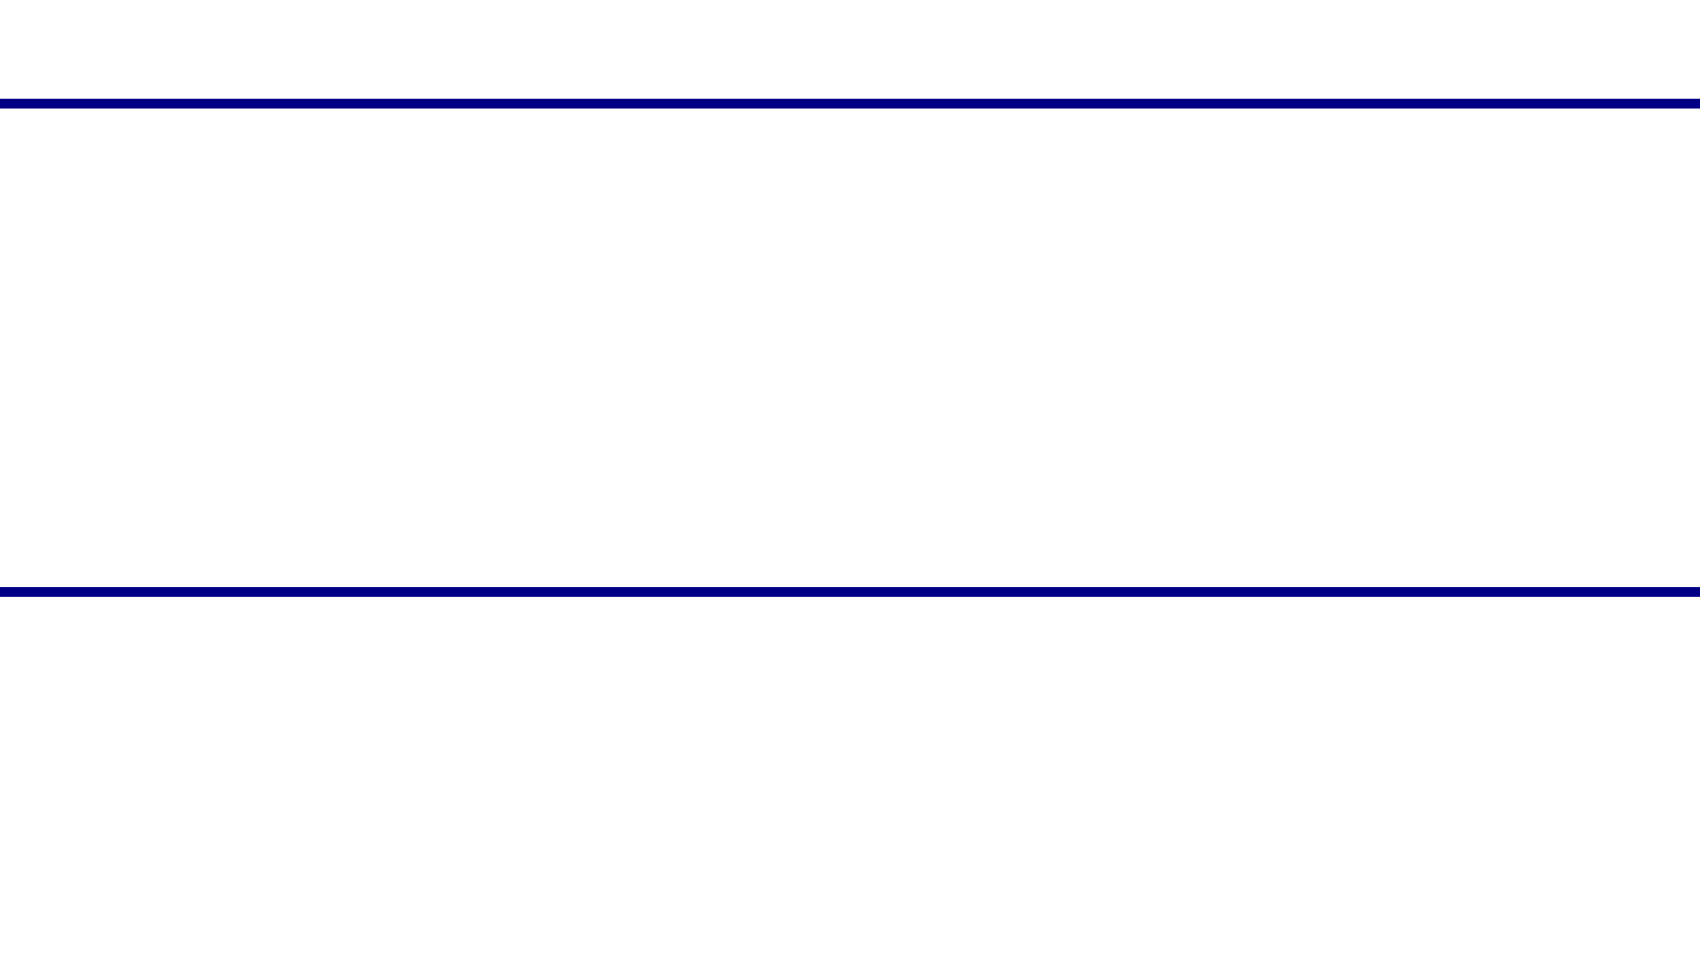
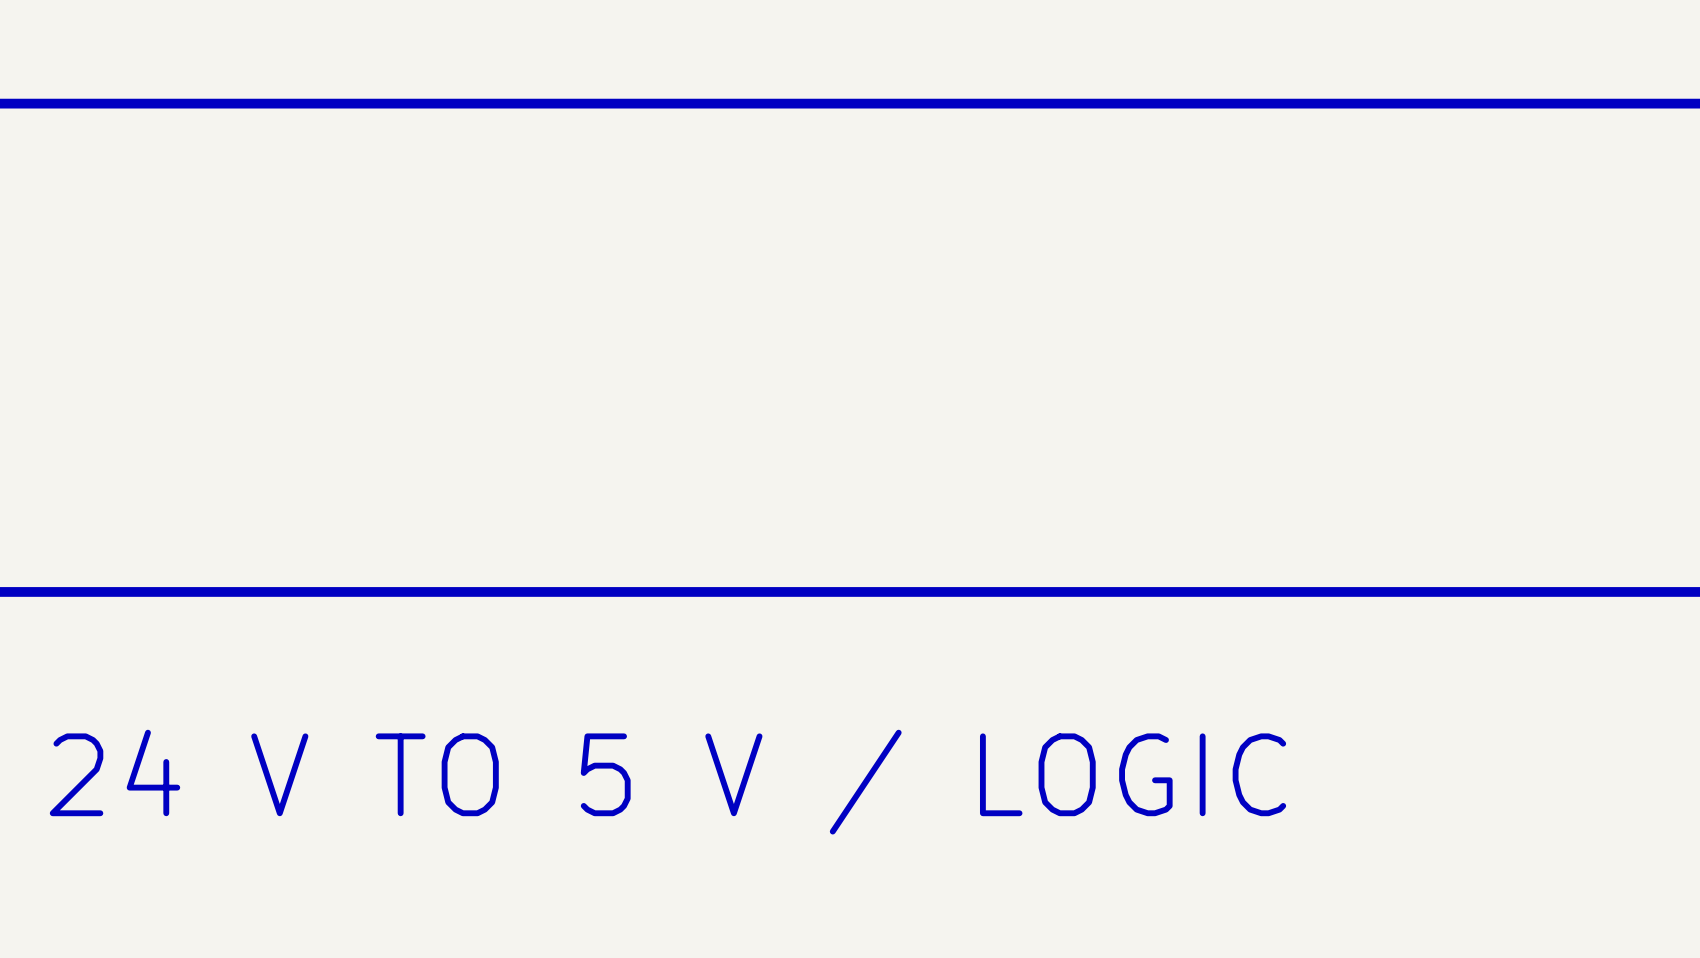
text: none -> 24 V TO 5 V / LOGIC (667, 782)

